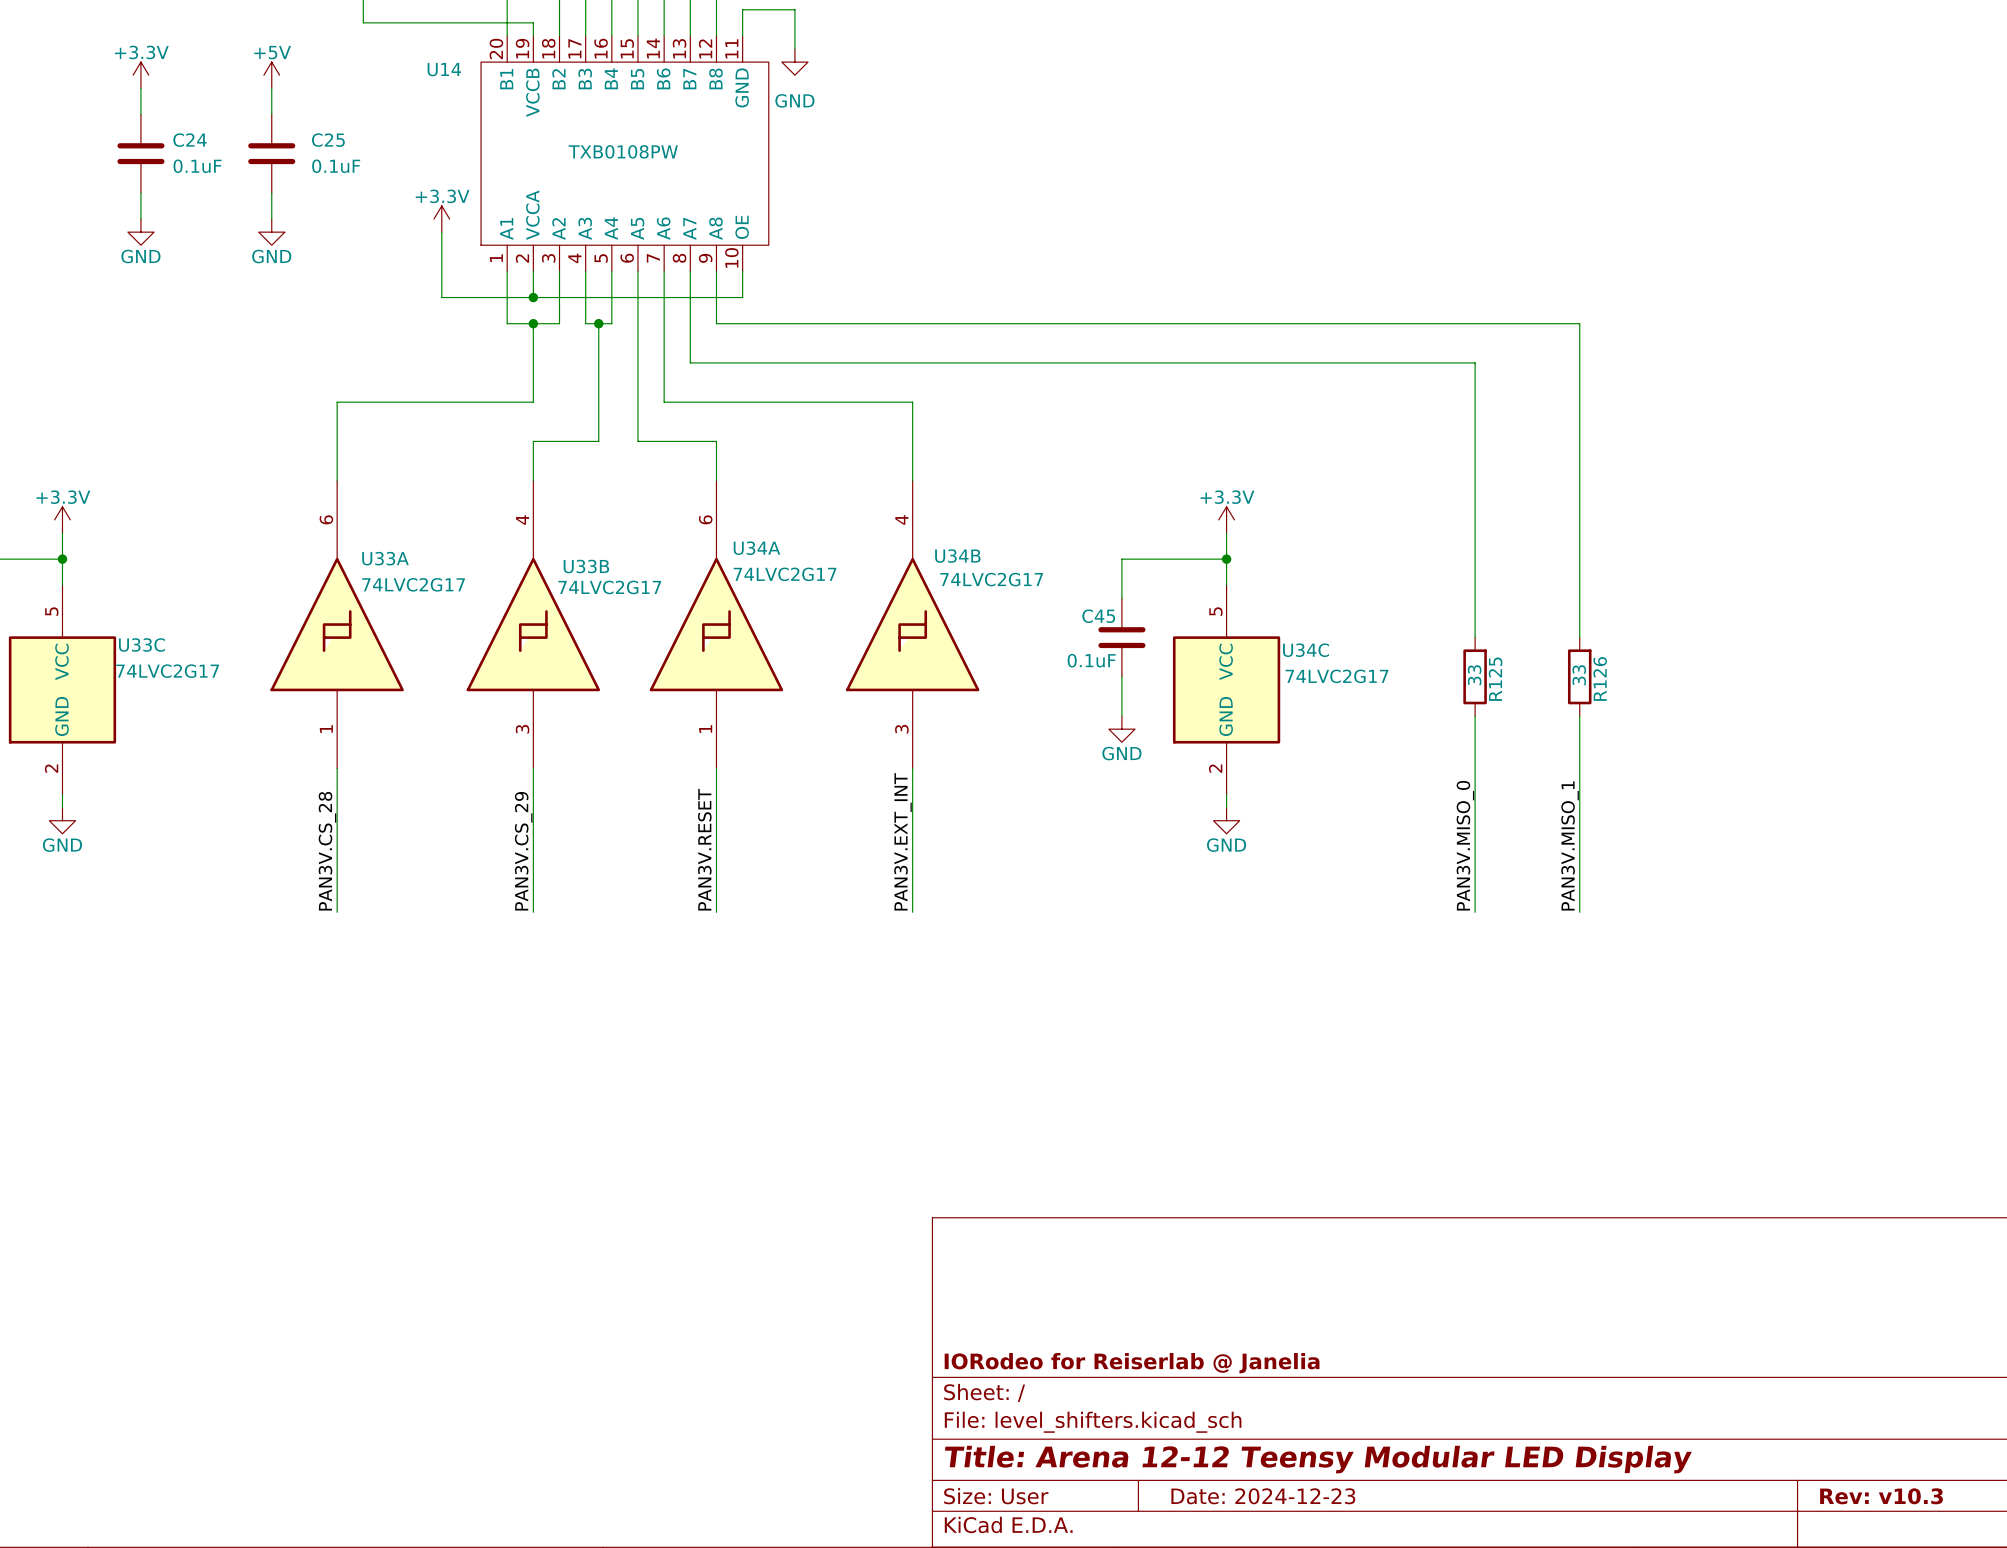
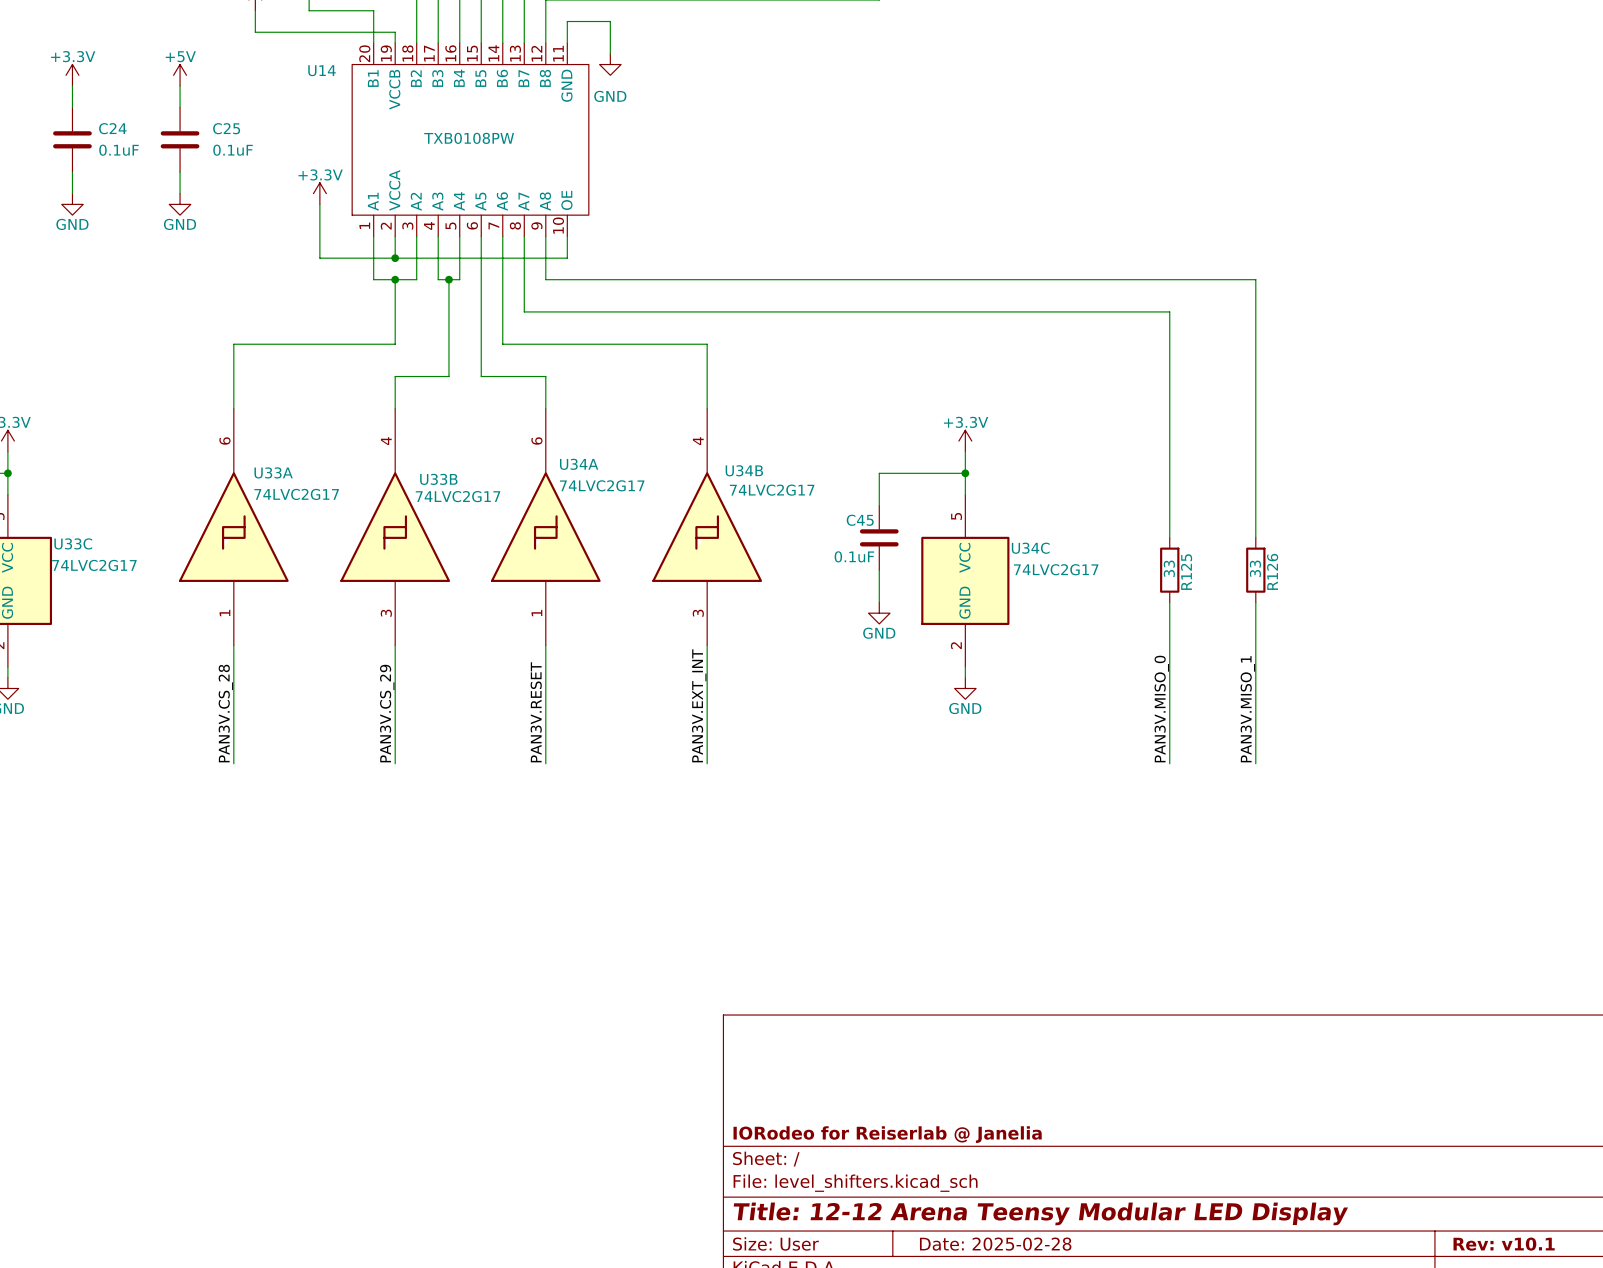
title block: Title: Arena 12-12 Teensy Modular LED Display (1318, 1459) -> Title: 12-12 Arena Teensy Modular LED Display (1040, 1213)
title block: Date: 2024-12-23 (1263, 1496) -> Date: 2025-02-28 (995, 1244)
title block: Rev: v10.3 (1881, 1496) -> Rev: v10.1 (1504, 1244)

